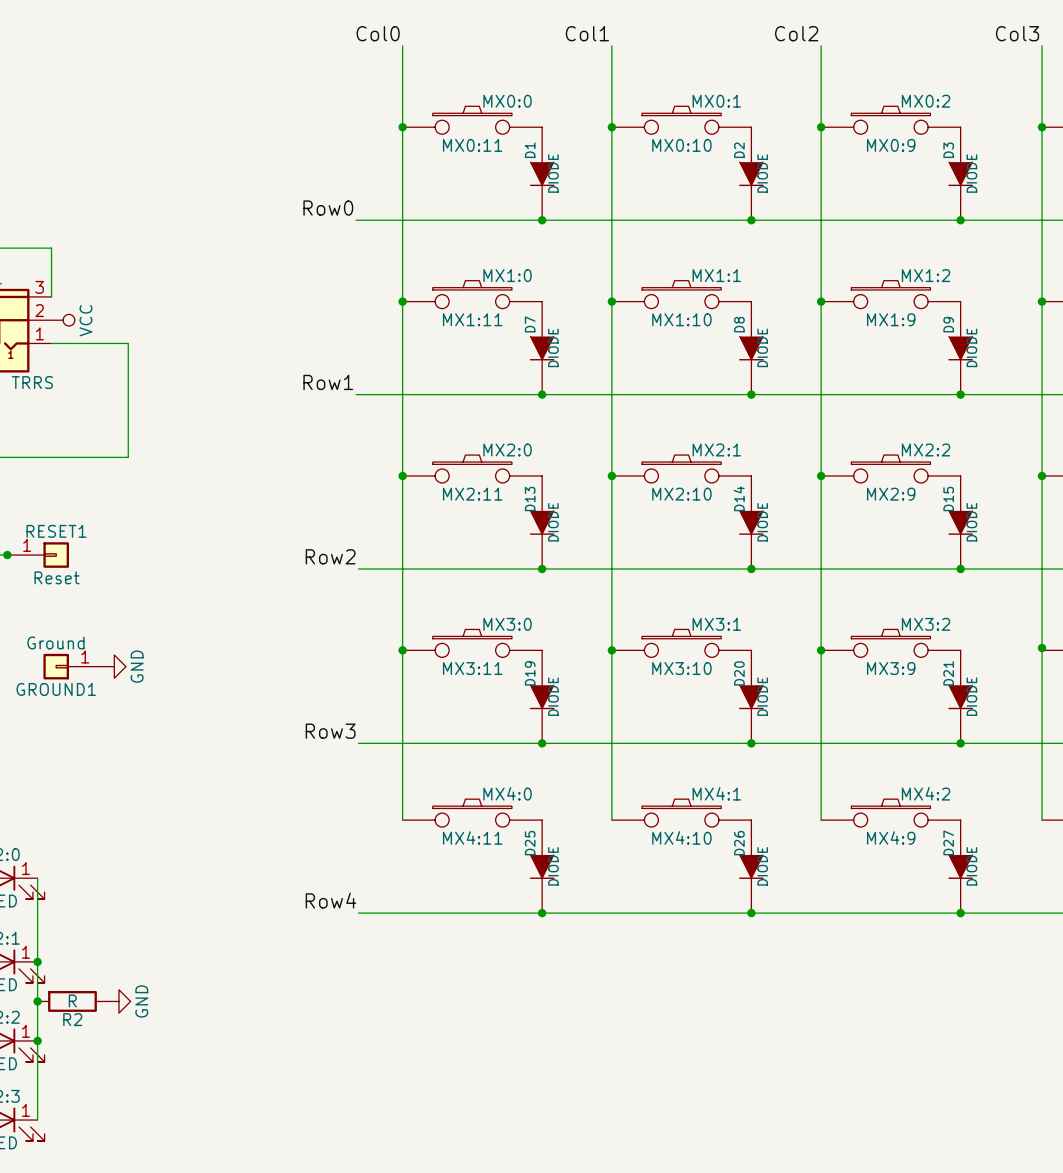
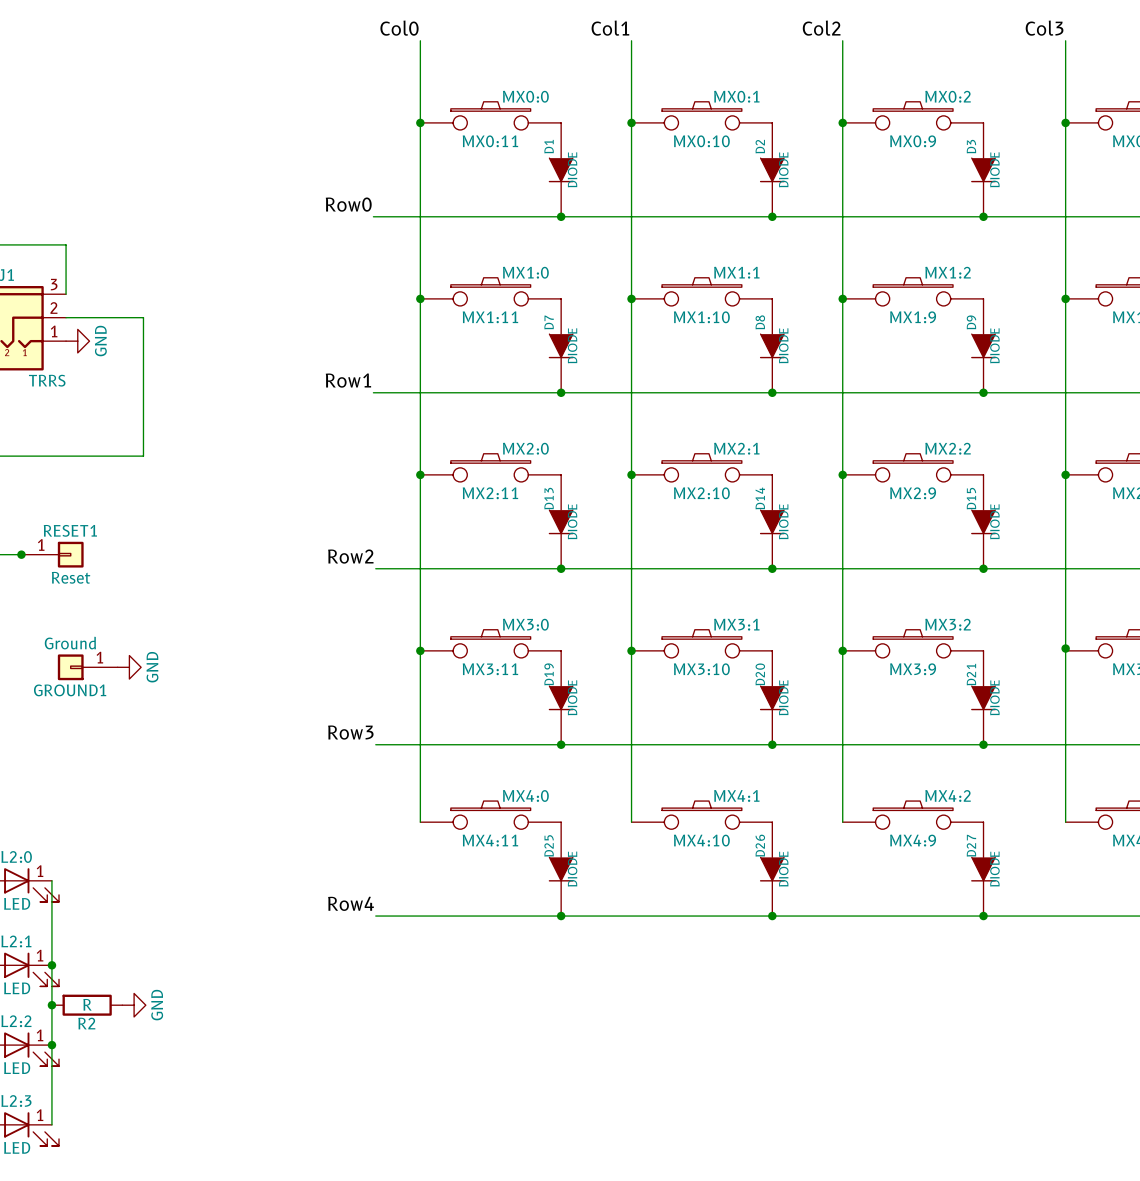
power symbol: VCC (63, 320) -> none
wire: (51, 343) (128, 343) -> (66, 317) (143, 317) (143, 341)
power symbol: none -> GND (77, 341)

